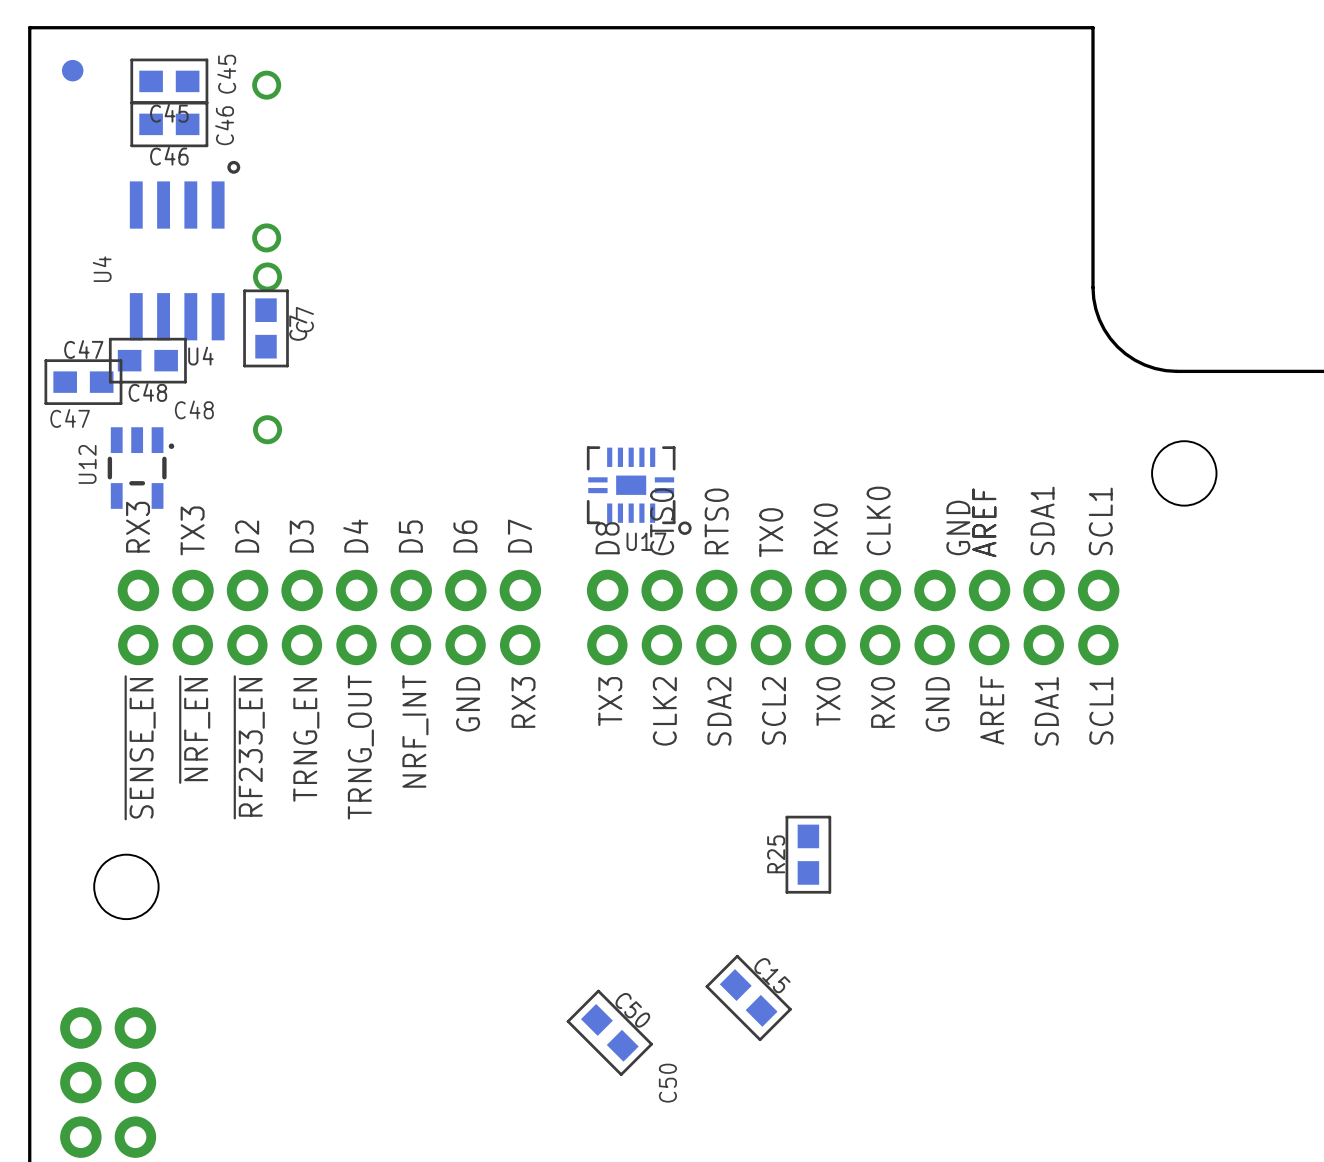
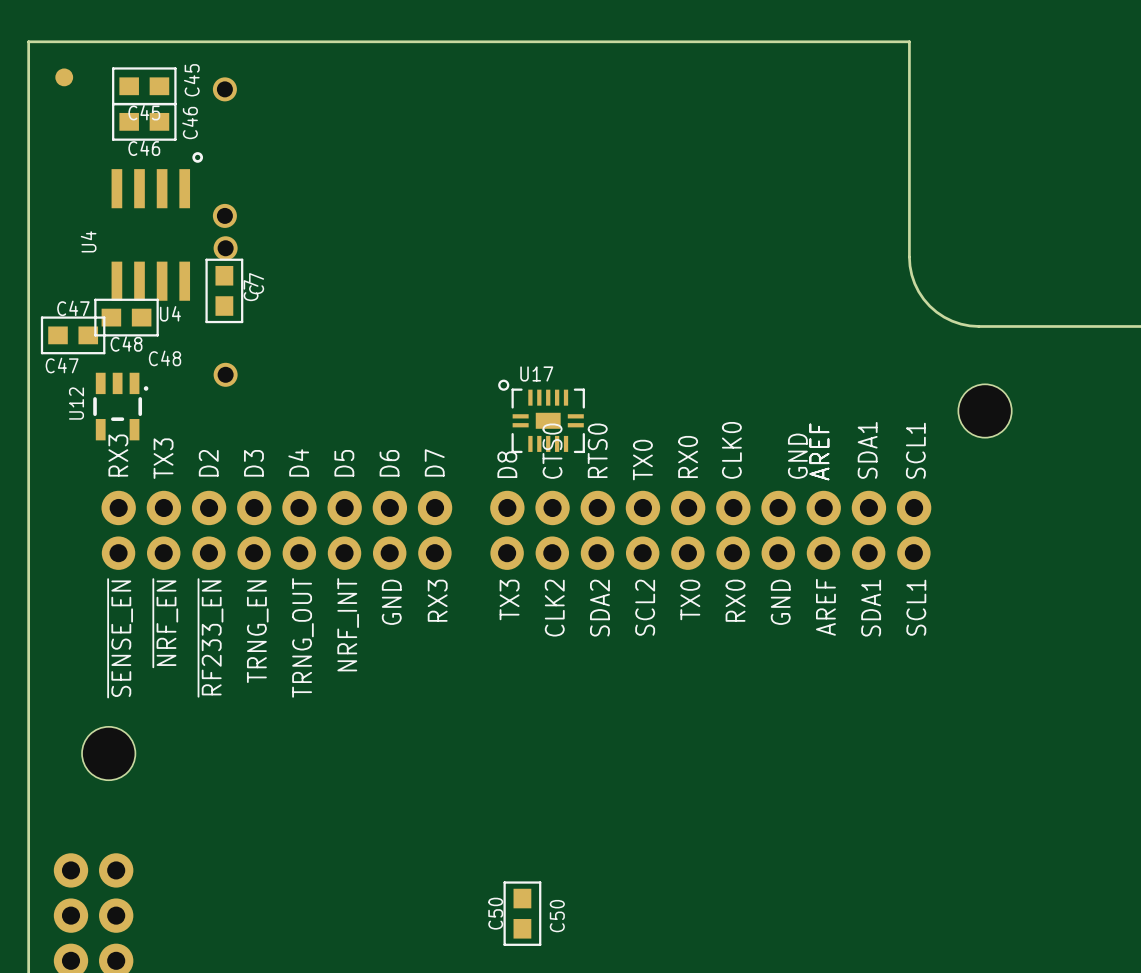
U17 rotation: 0° (639, 490) -> 180° (541, 416)
R25: (808, 854) -> none
C15: (748, 997) -> none
C50 name position: C50 (632, 1010) -> C50 (495, 913)
C50 rotation: 0° (609, 1032) -> 45° clockwise (522, 913)

